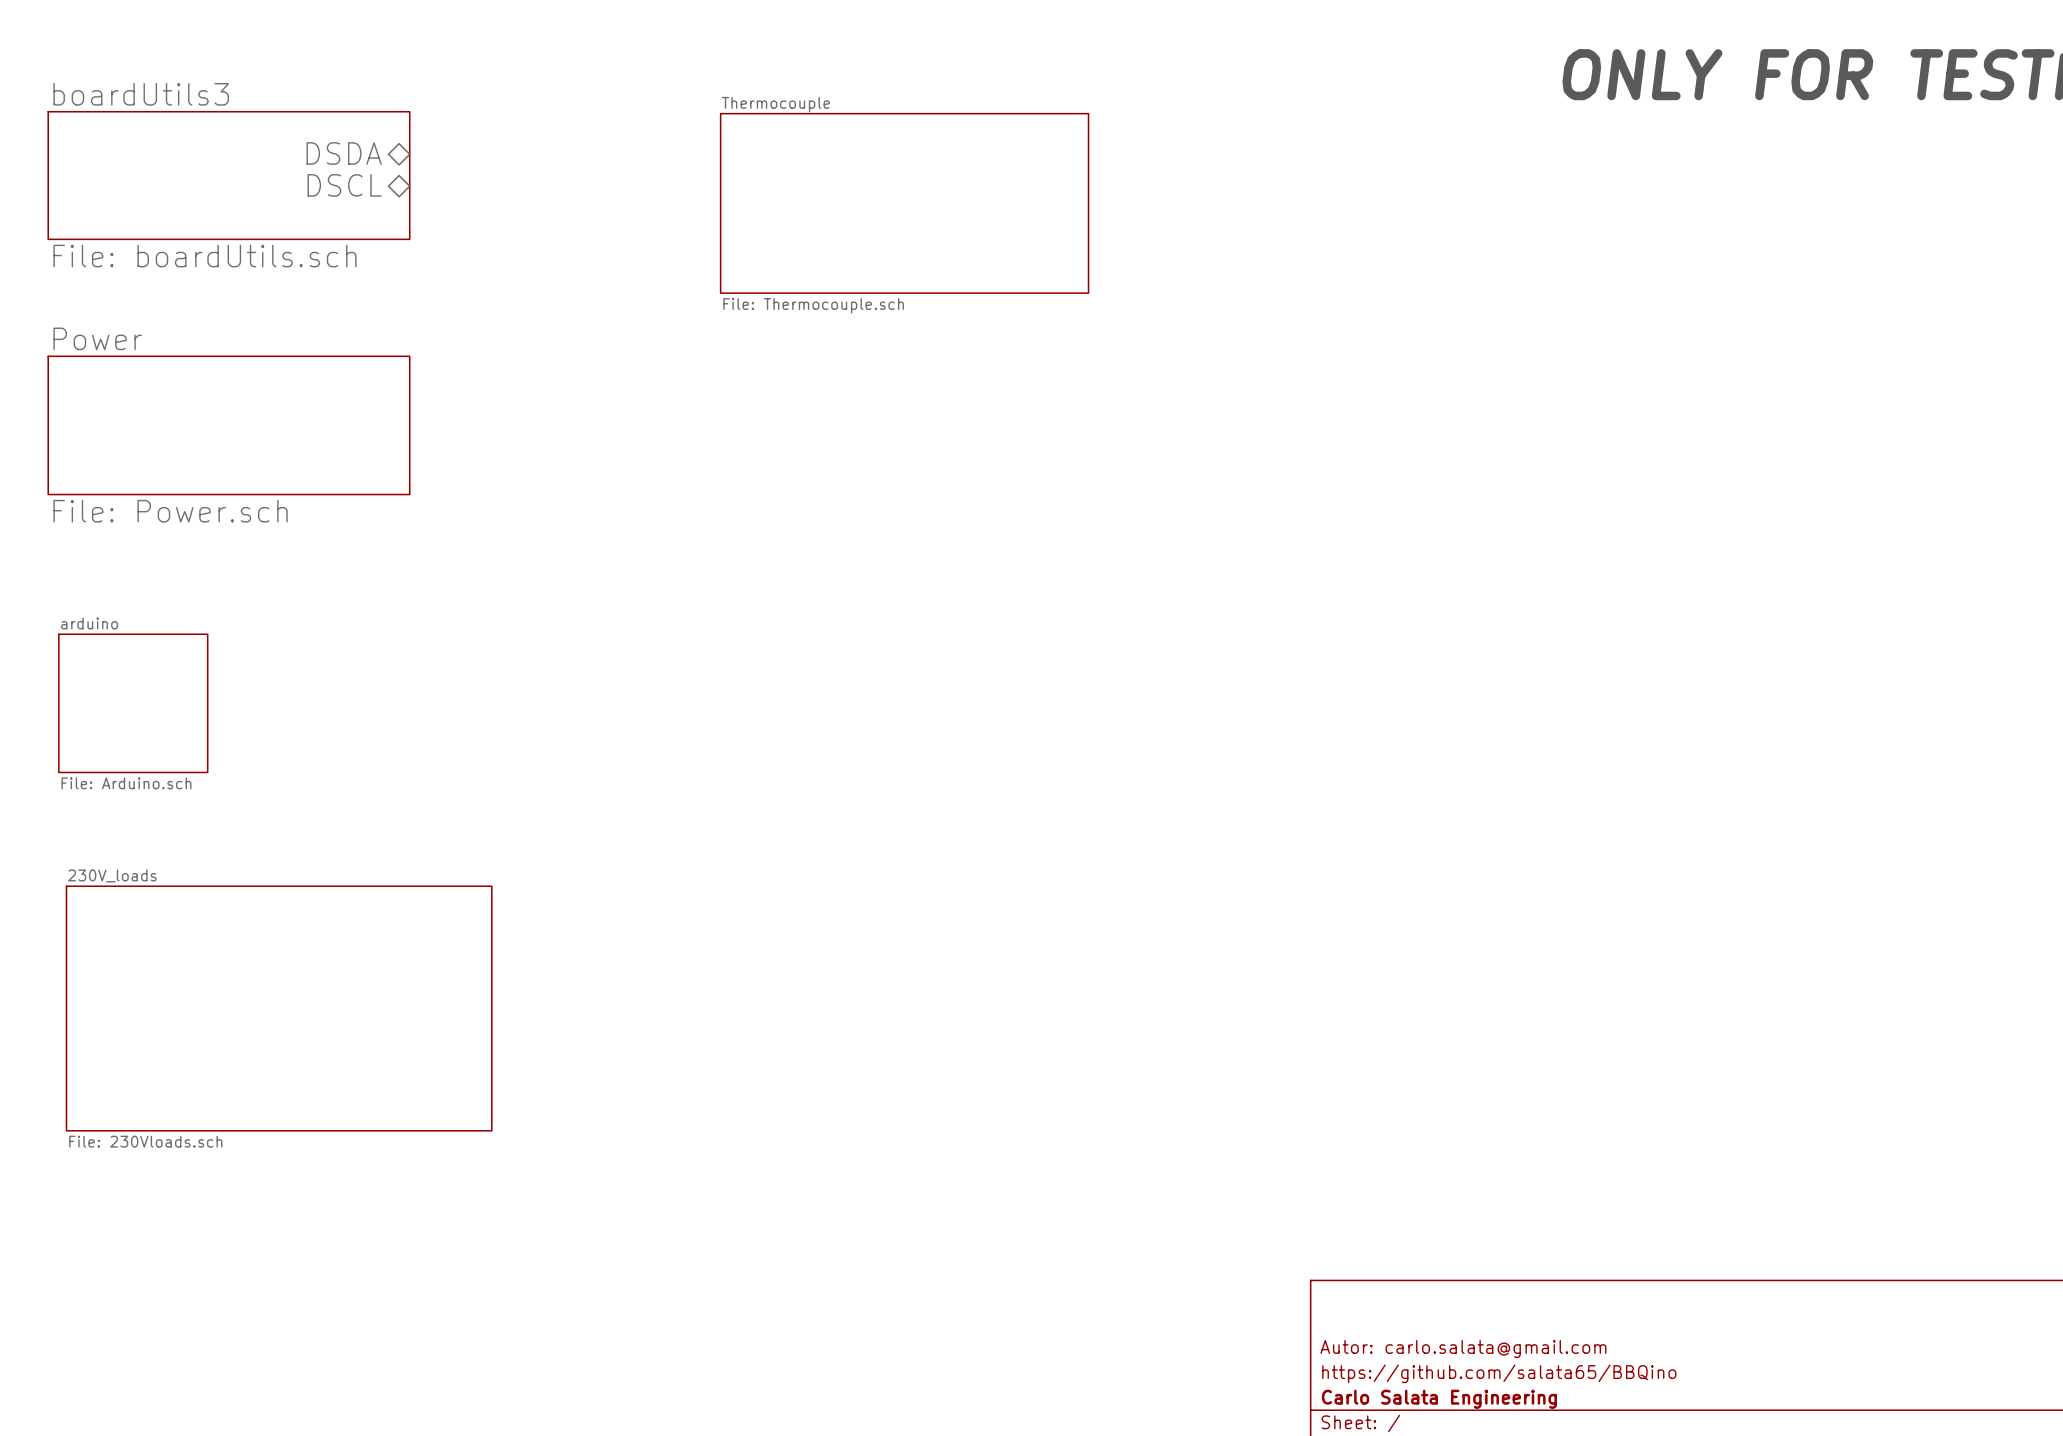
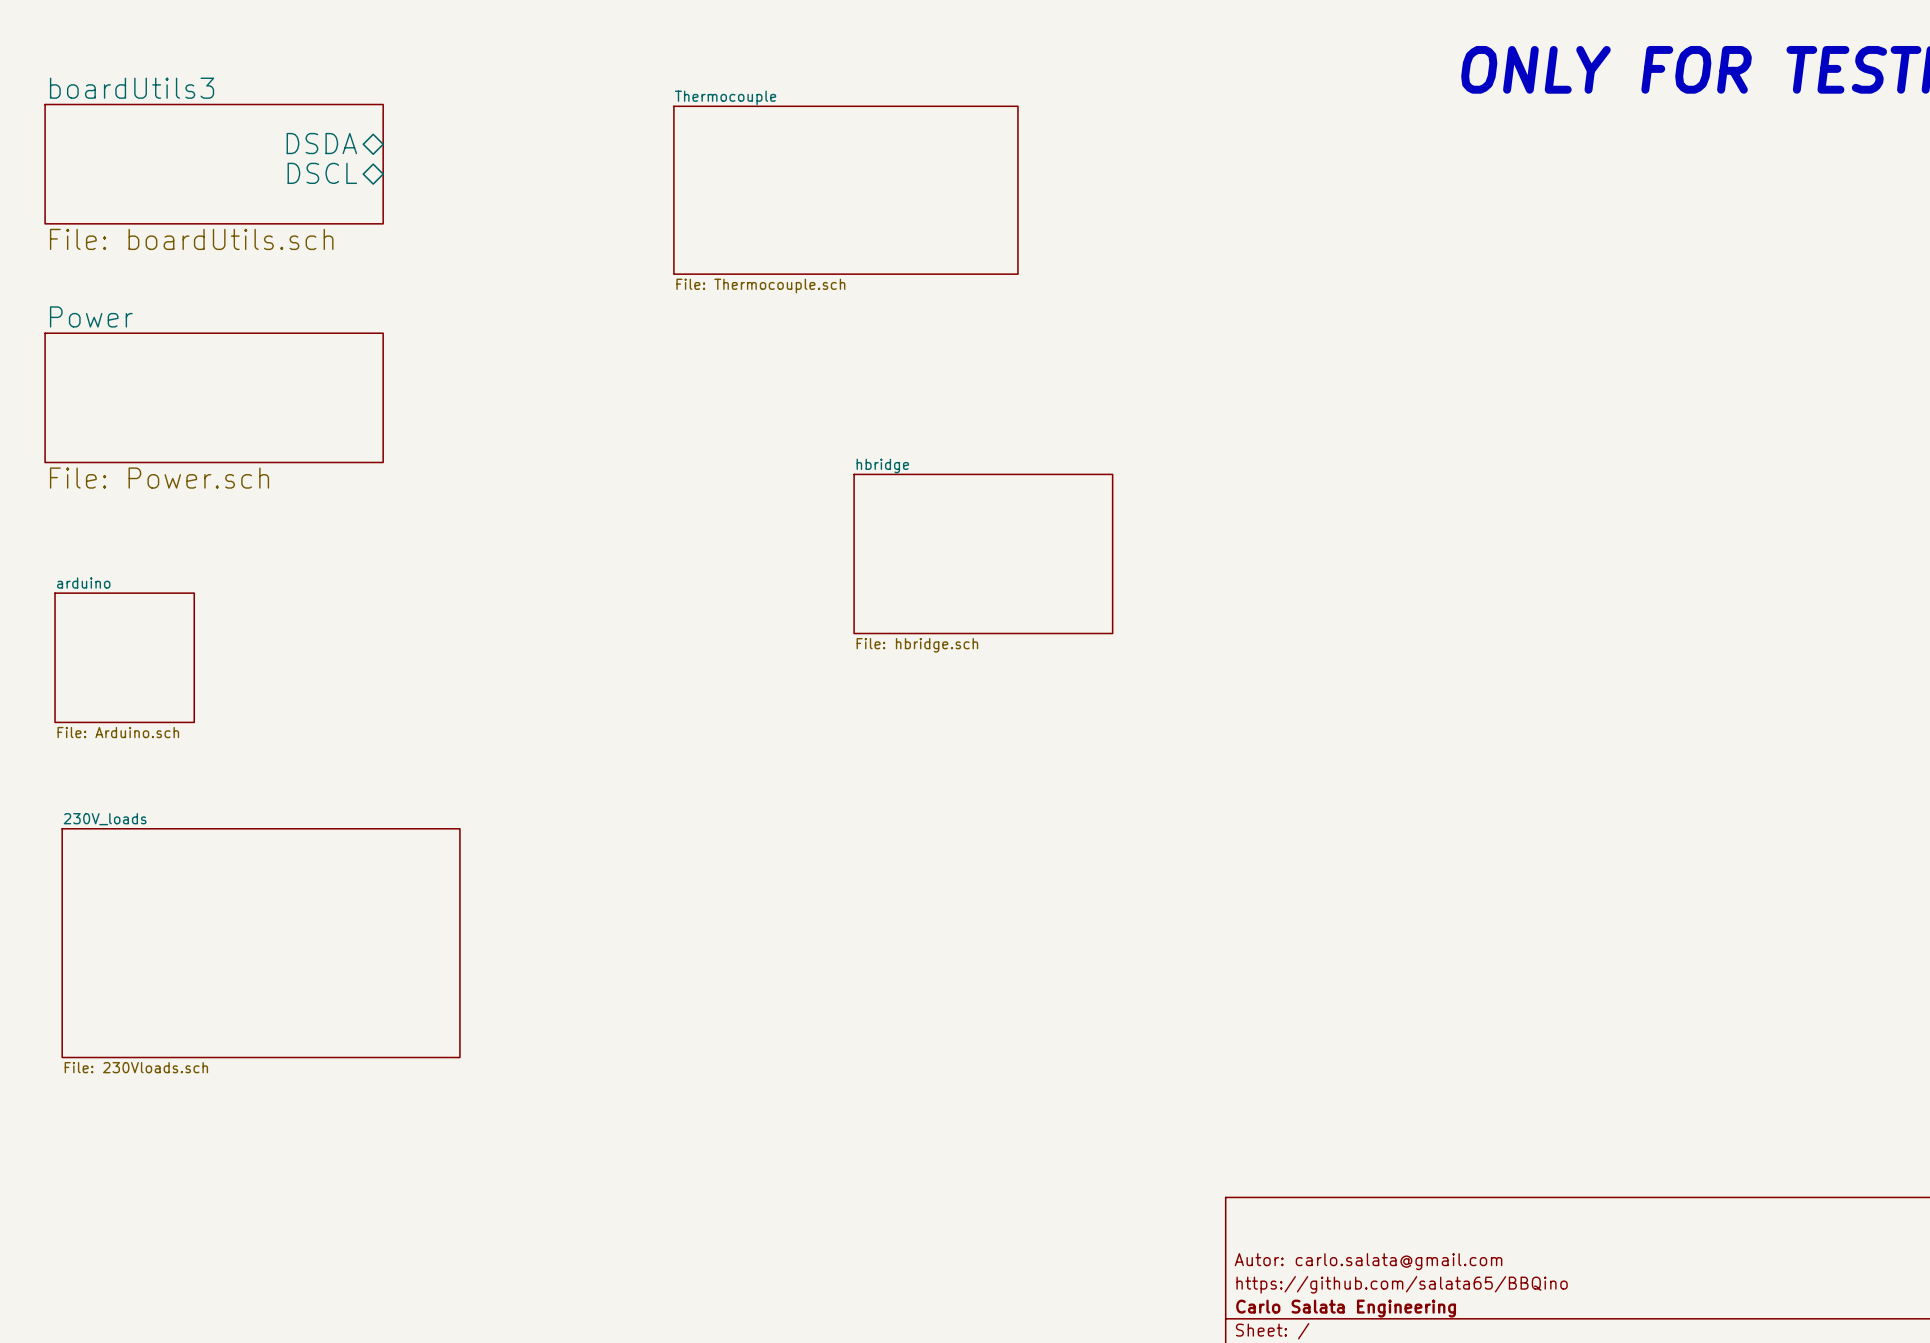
sheet hbridge: none -> File: hbridge.sch (983, 553)

